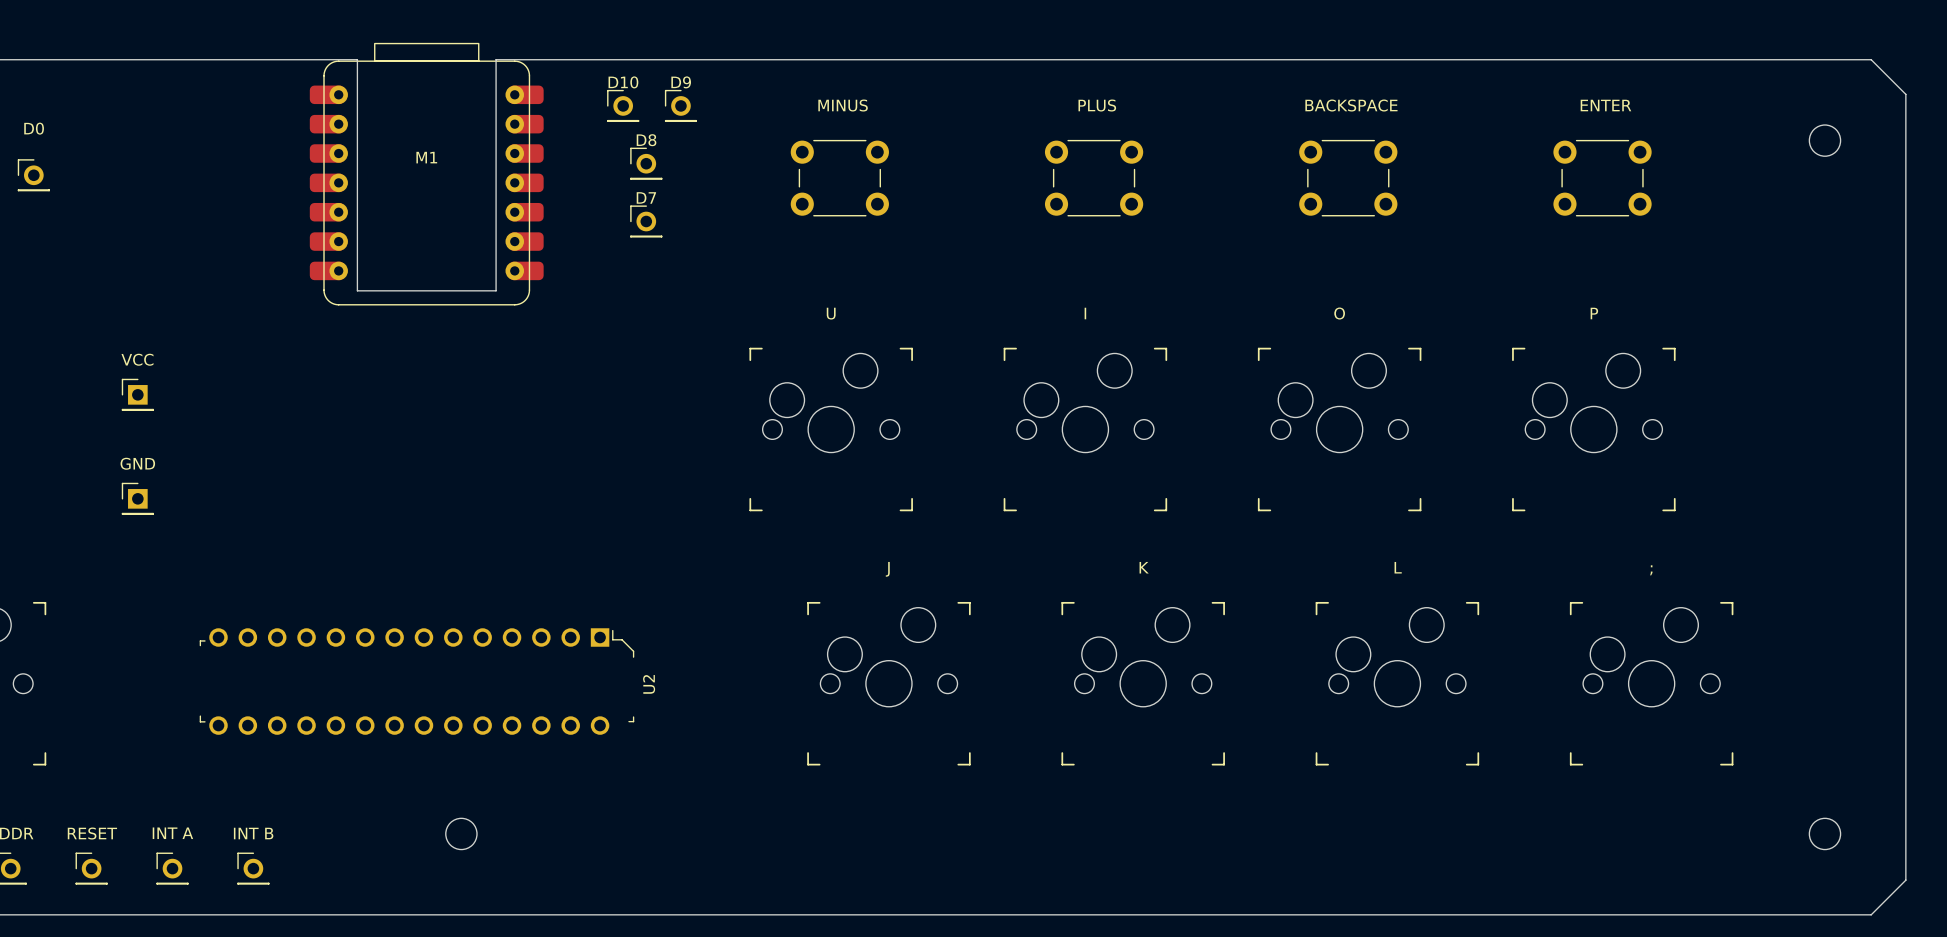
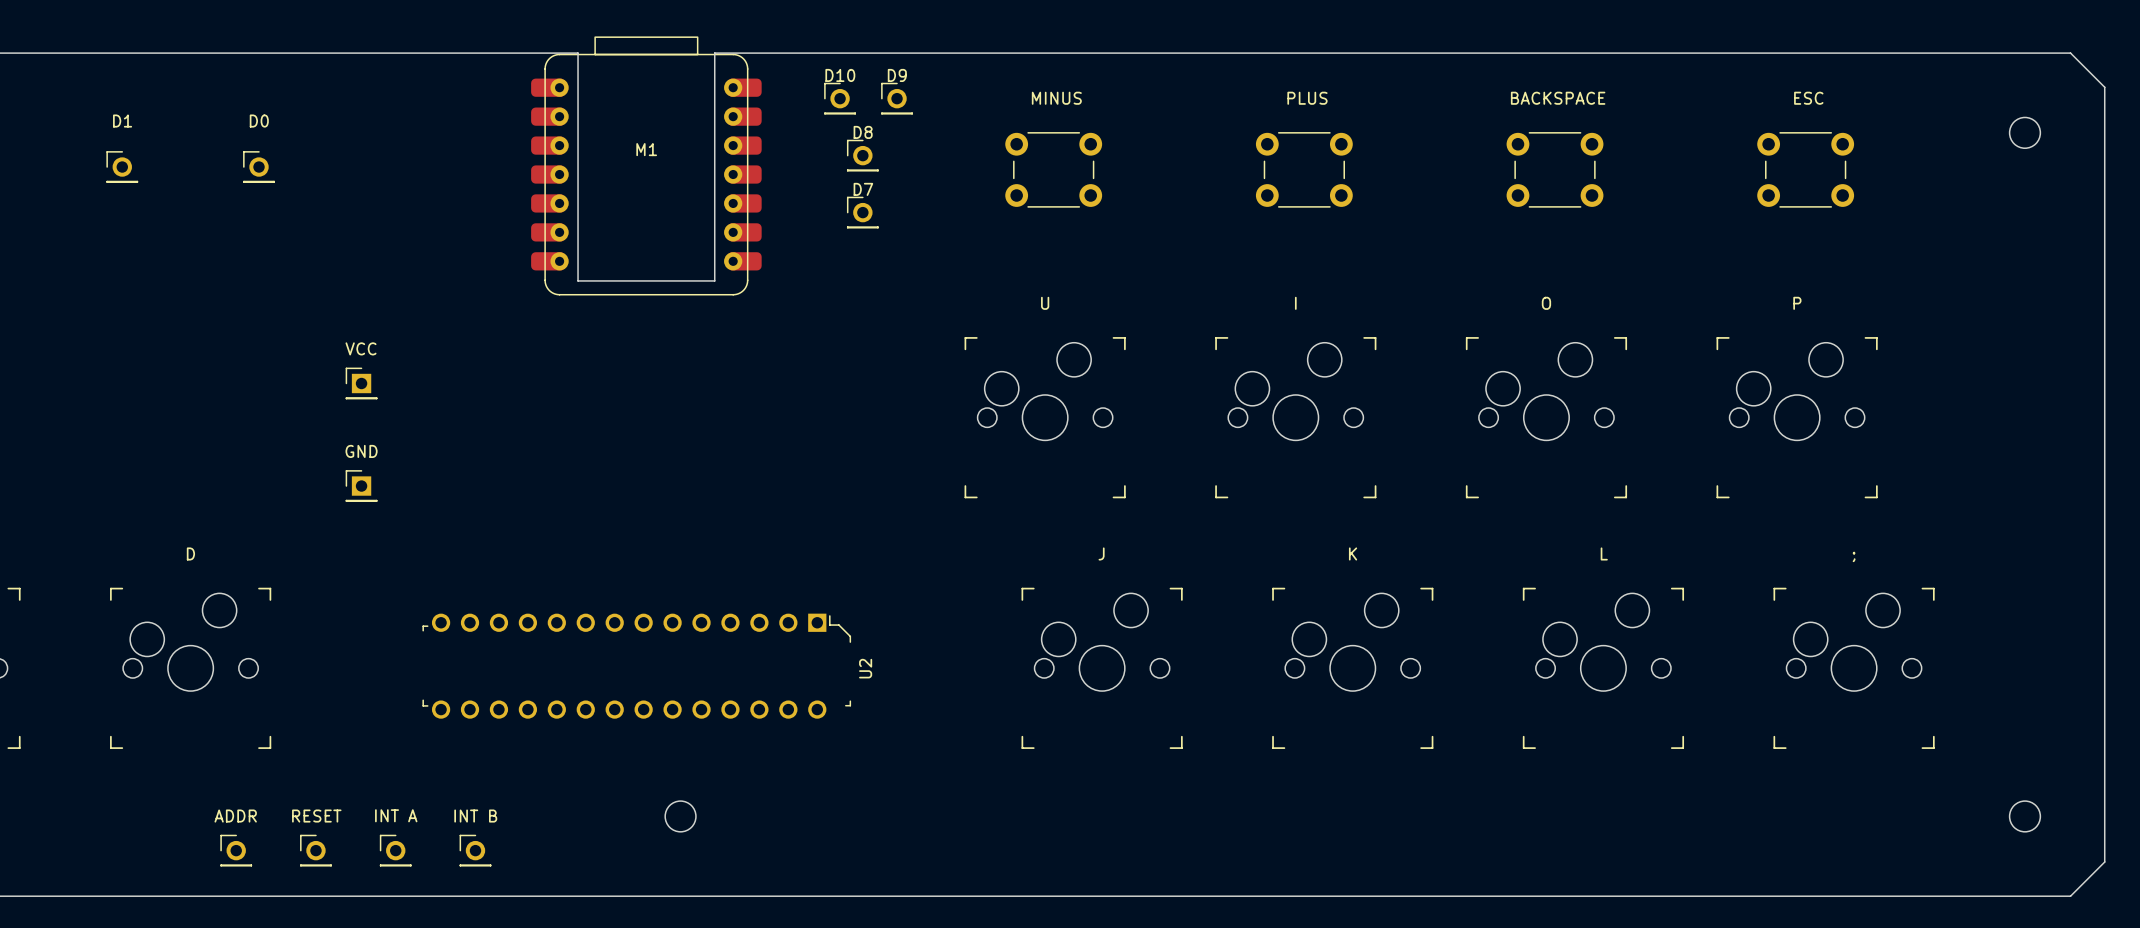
text: ENTER (1605, 105) -> ESC (1808, 98)

